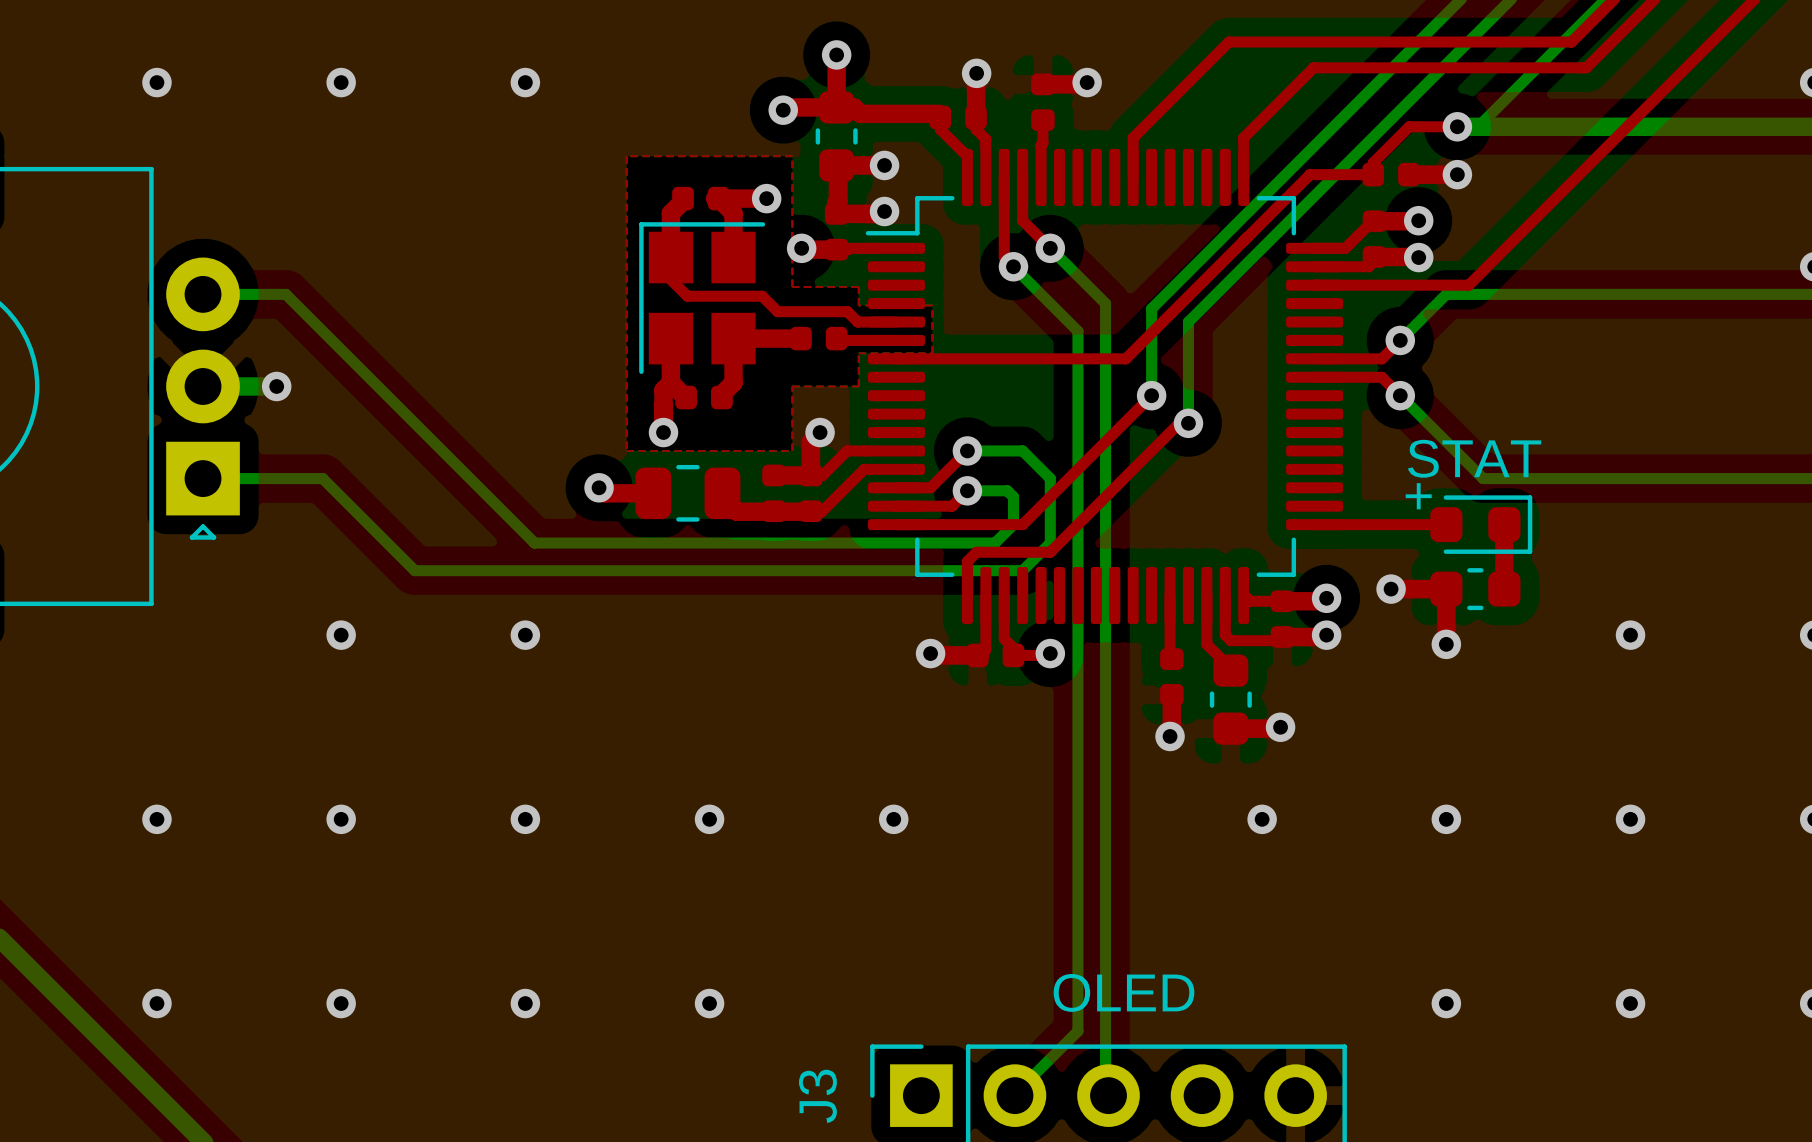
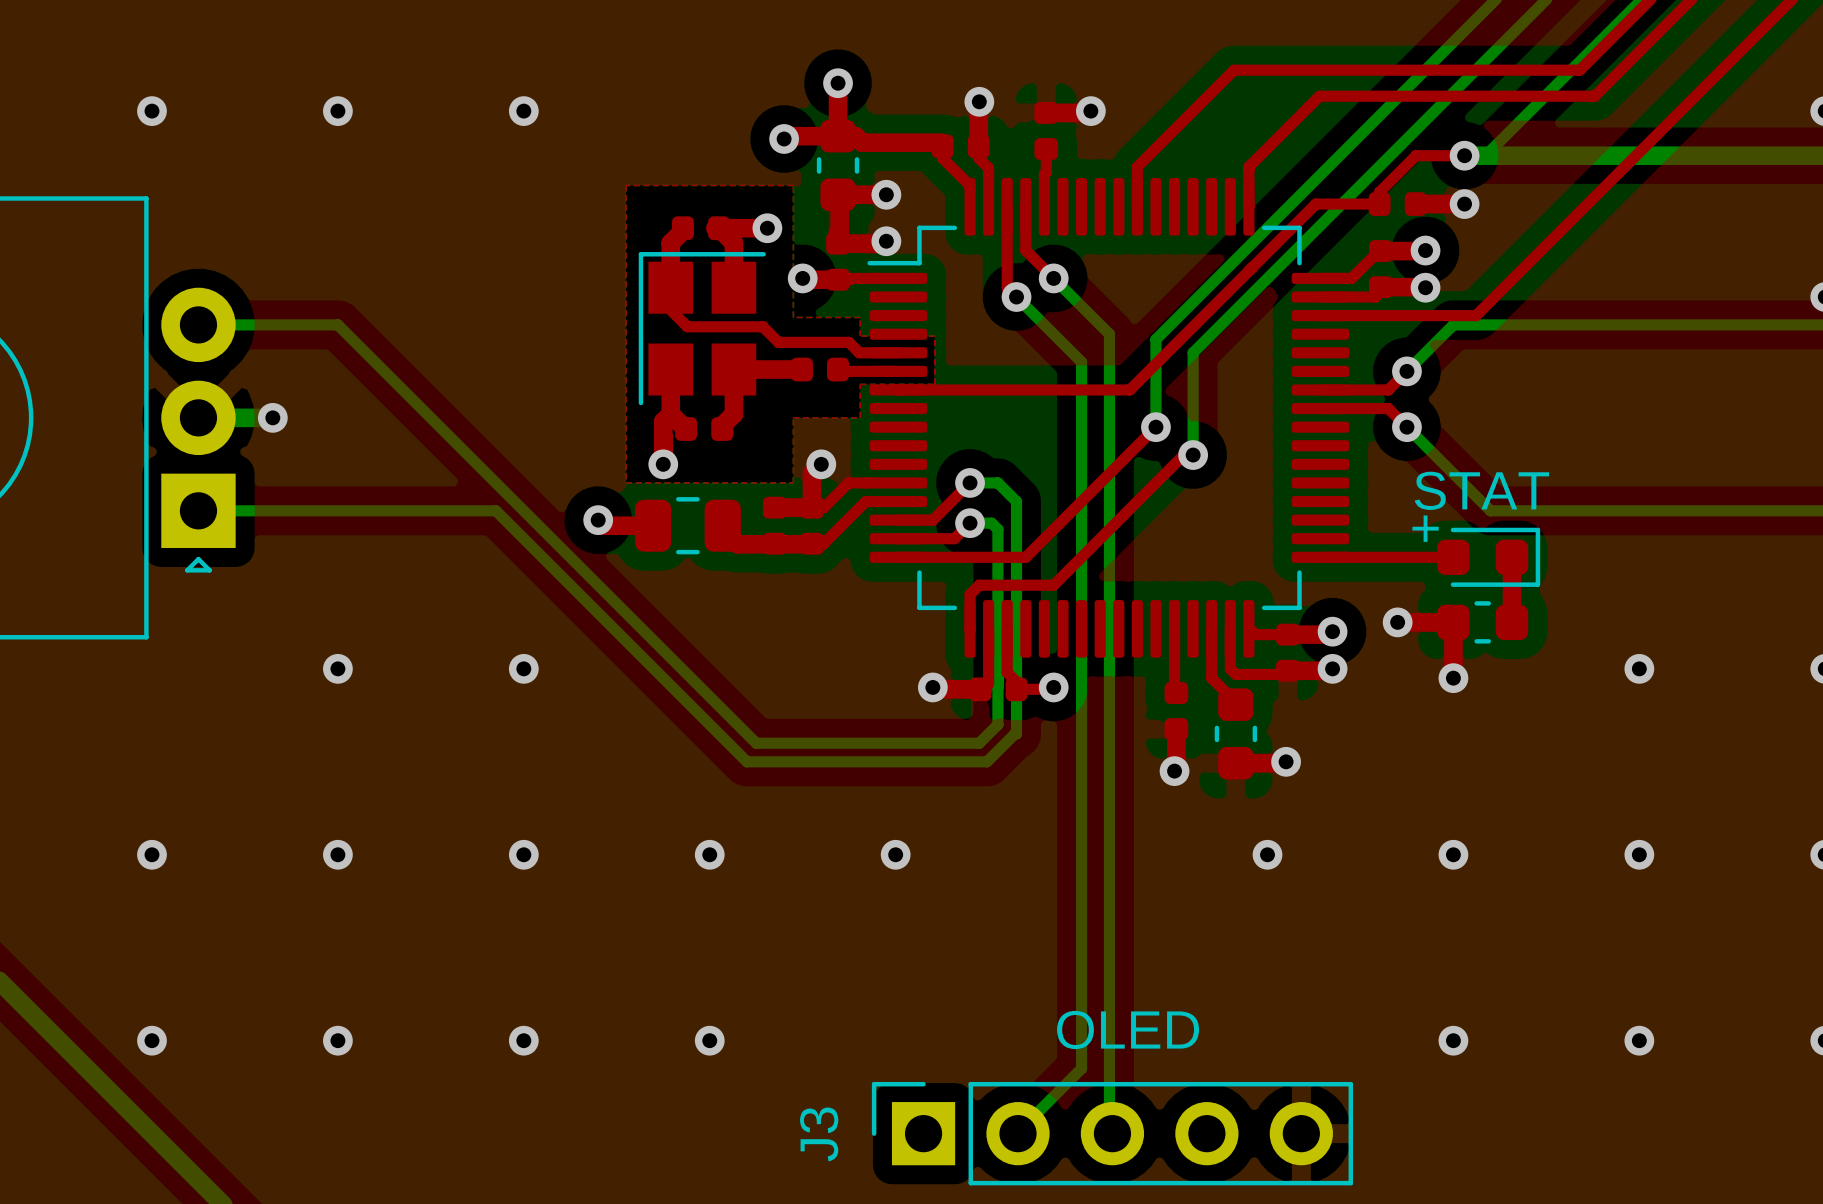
bottom track: (285, 294) (534, 543) (995, 543) (1013, 524) -> (282, 324) (337, 324) (756, 743) (979, 743) (997, 724) (997, 529) (991, 523)
bottom track: (995, 450) (1022, 450) (1050, 478) (1050, 543) (1022, 570) (414, 570) (322, 478) -> (1016, 557) (1016, 733) (987, 761) (746, 761) (495, 510) (319, 510)
bottom track: (988, 490) (1007, 490) (1013, 497) -> (997, 482) (1016, 501) (1016, 529)

